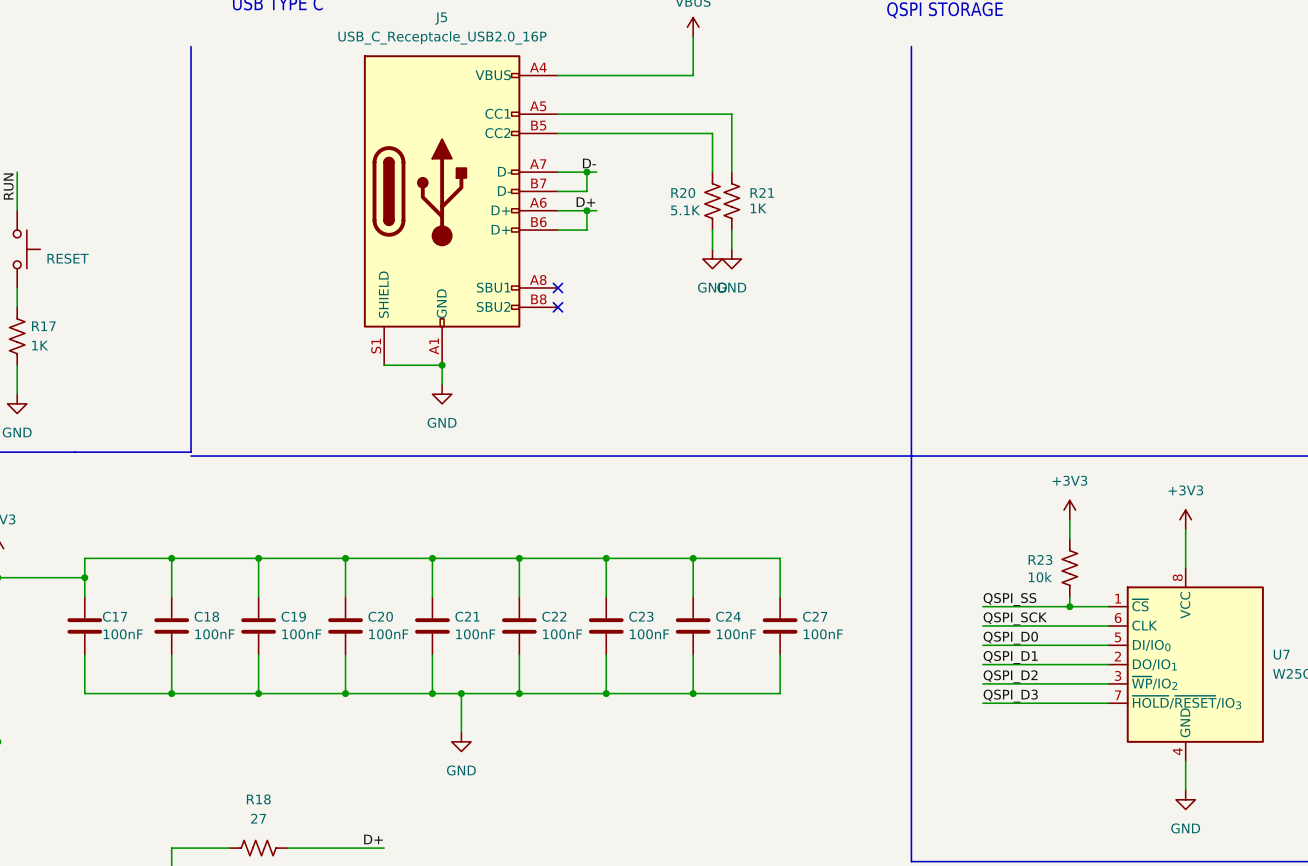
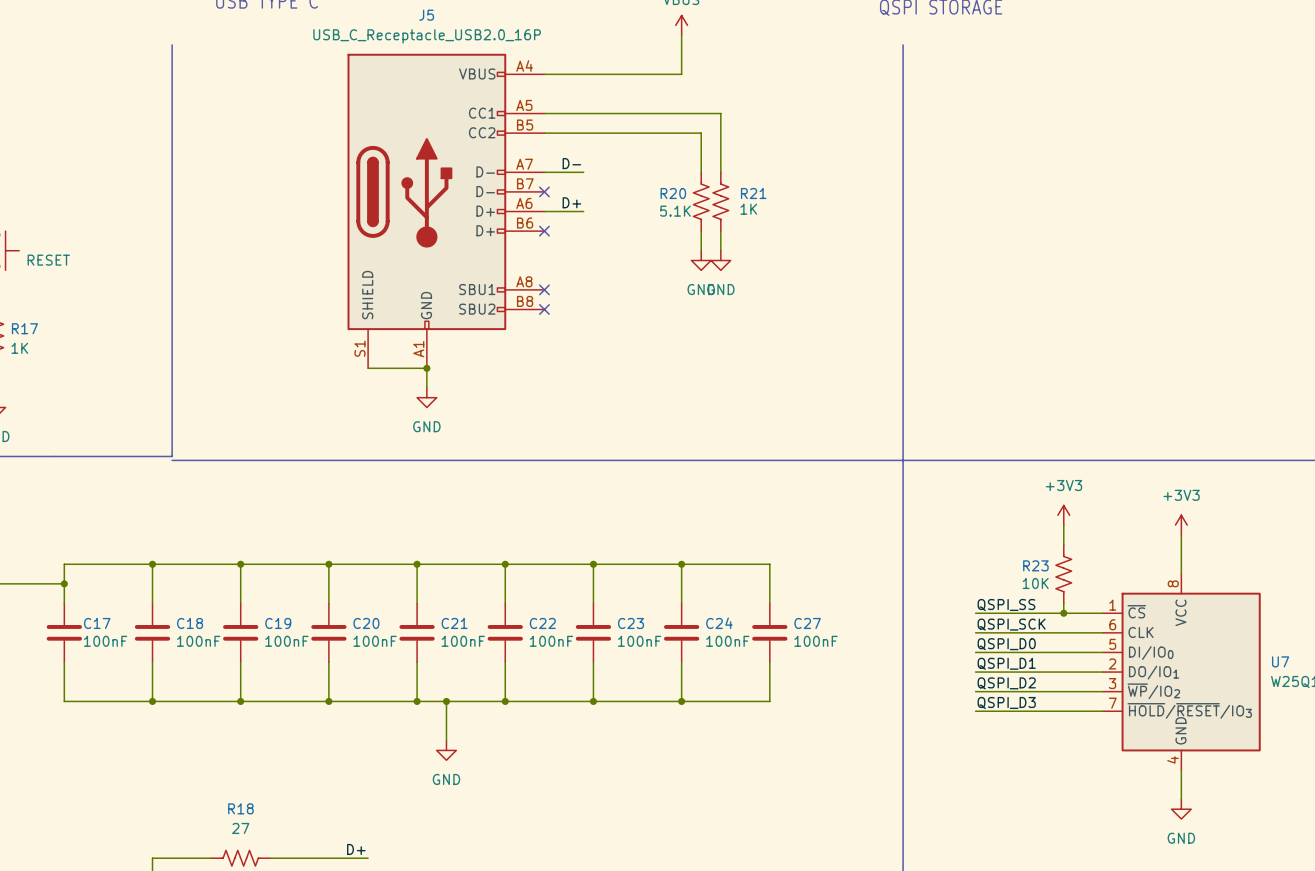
wire: (586, 172) (586, 191) (557, 191) -> none
junction: (586, 172) -> none
no-connect mark: none -> (544, 191)
wire: (586, 210) (586, 230) (557, 230) -> none
junction: (586, 210) -> none
no-connect mark: none -> (544, 231)
R23 value: 10k (1040, 577) -> 10K (1035, 583)

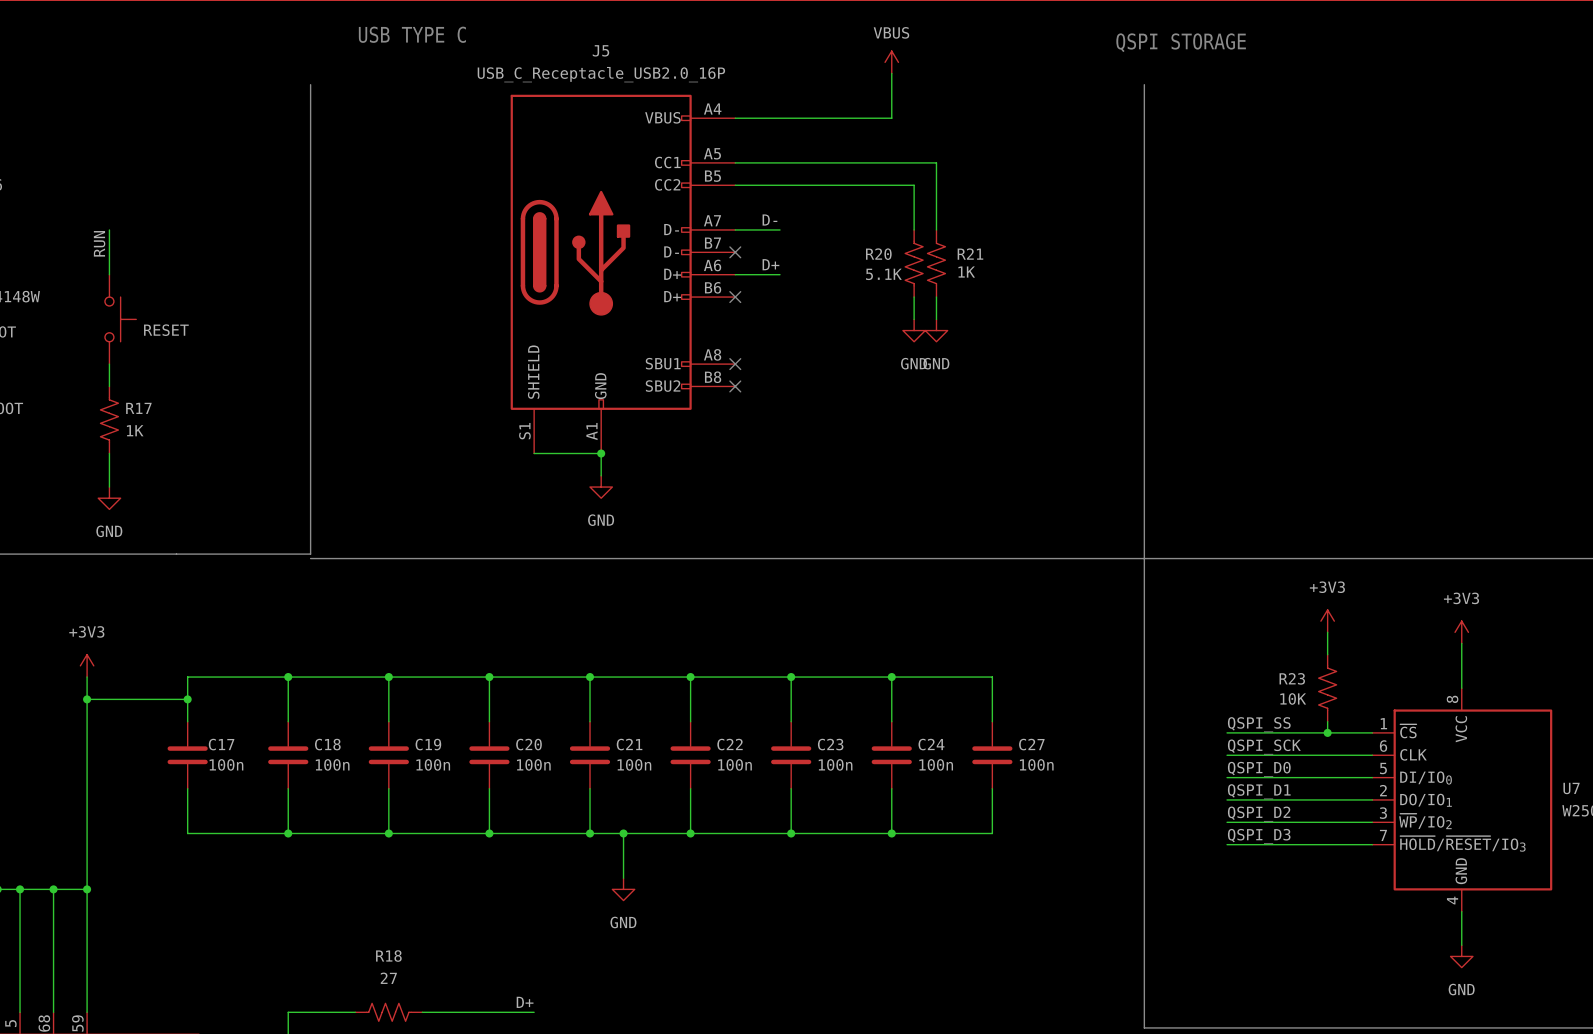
C17 value: 100nF (105, 641) -> 100n (226, 764)
C18 value: 100nF (198, 641) -> 100n (332, 764)
C19 value: 100nF (286, 641) -> 100n (433, 764)
C20 value: 100nF (375, 641) -> 100n (533, 764)
C21 value: 100nF (463, 641) -> 100n (634, 764)
C22 value: 100nF (551, 641) -> 100n (734, 764)
C23 value: 100nF (639, 641) -> 100n (835, 764)
C24 value: 100nF (727, 641) -> 100n (936, 764)
C27 value: 100nF (815, 641) -> 100n (1036, 764)

